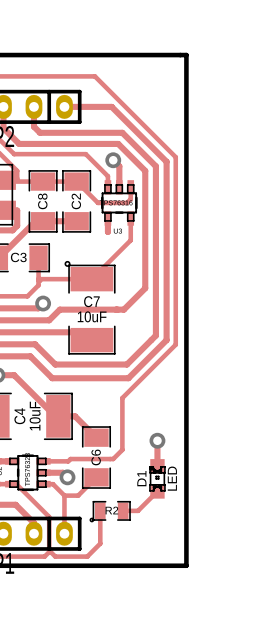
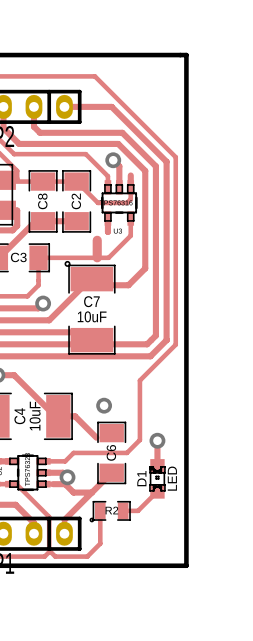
track: none -> (130, 175) (130, 187)
track: (130, 235) (130, 240) (91, 279) (38, 279) (40, 280) (38, 280) -> (130, 235) (108, 257) (38, 257)
track: none -> (97, 240) (97, 257)
track: (145, 268) (145, 288) (123, 309) (59, 309) -> (145, 268) (128, 285) (84, 285) (59, 309)
track: (35, 344) (55, 364) (126, 364) (147, 344) -> (35, 344) (147, 344)
track: (30, 356) (52, 378) (128, 378) (150, 356) -> (30, 356) (150, 356)
track: (139, 380) (122, 398) (122, 449) (113, 459) (70, 459) (65, 461) -> (139, 380) (139, 439) (126, 452) (73, 452) (65, 461)
via: none -> (104, 405)
C6 position: (96, 457) -> (111, 452)
track: (96, 477) (78, 495) (64, 495) -> none
track: (53, 484) (64, 495) -> (53, 484) (65, 484) (73, 492) (91, 492)
track: (64, 495) (64, 520) -> (111, 472) (64, 520)

